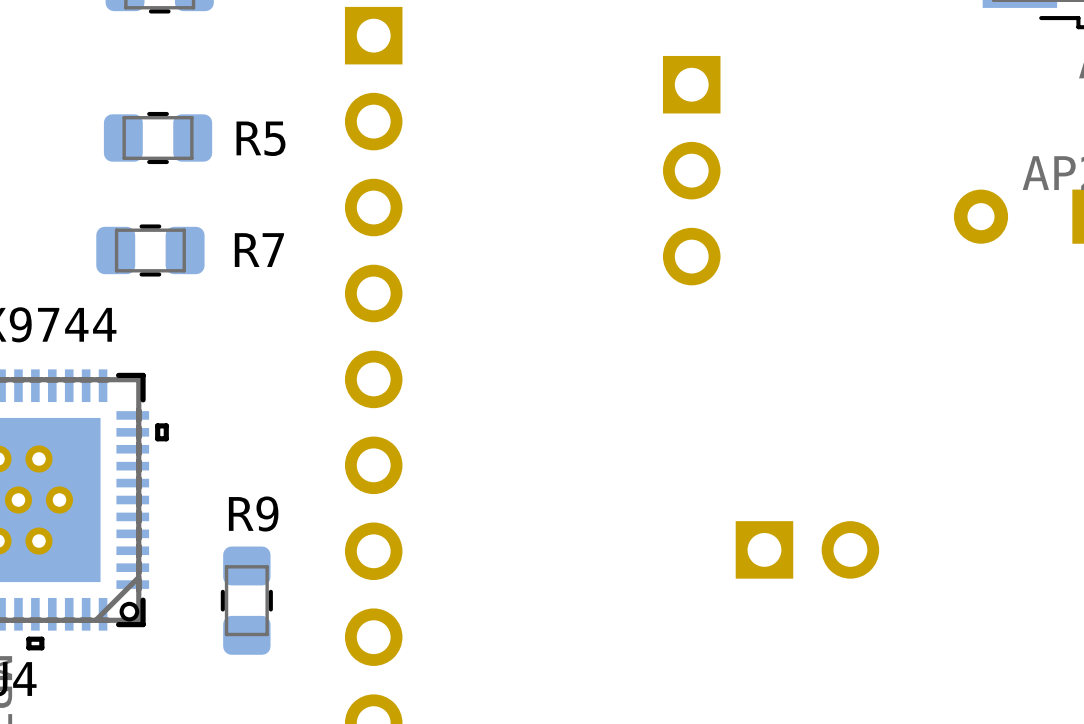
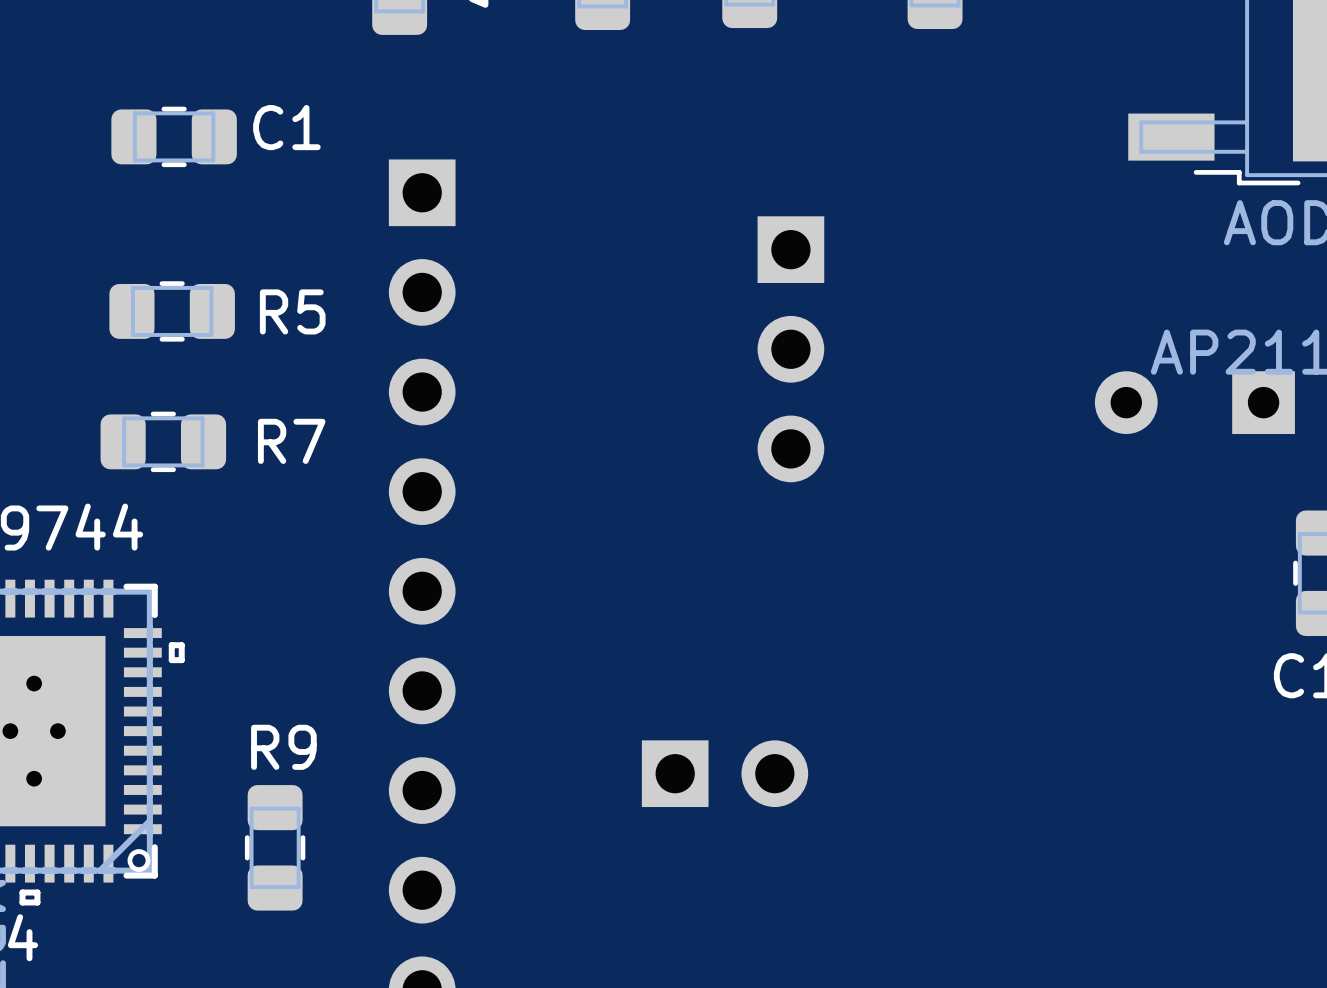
part position: (807, 549) -> (725, 773)

